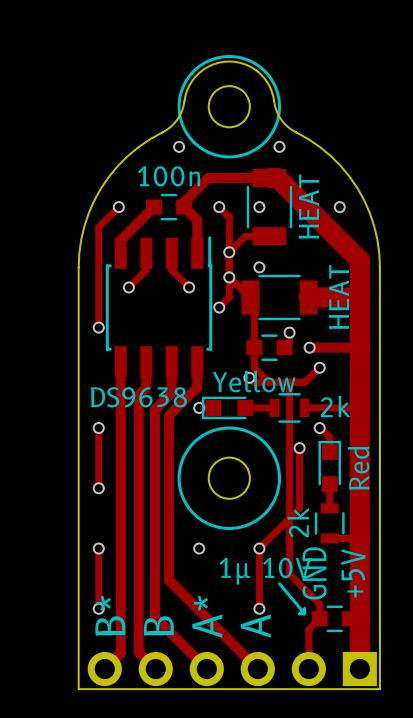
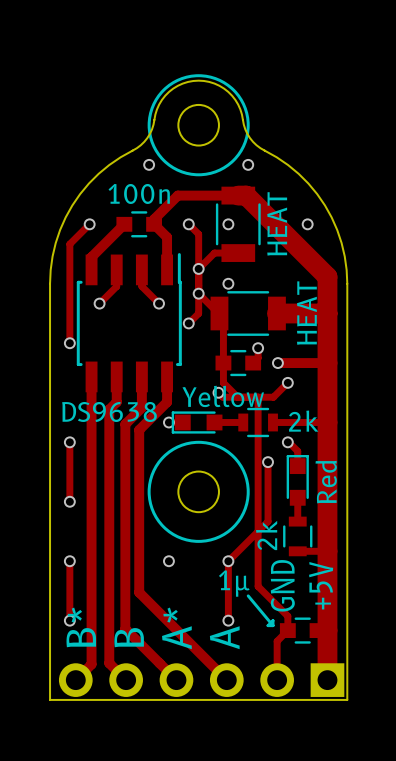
part value: 1µ 10V (265, 571) -> 1µ (234, 583)

